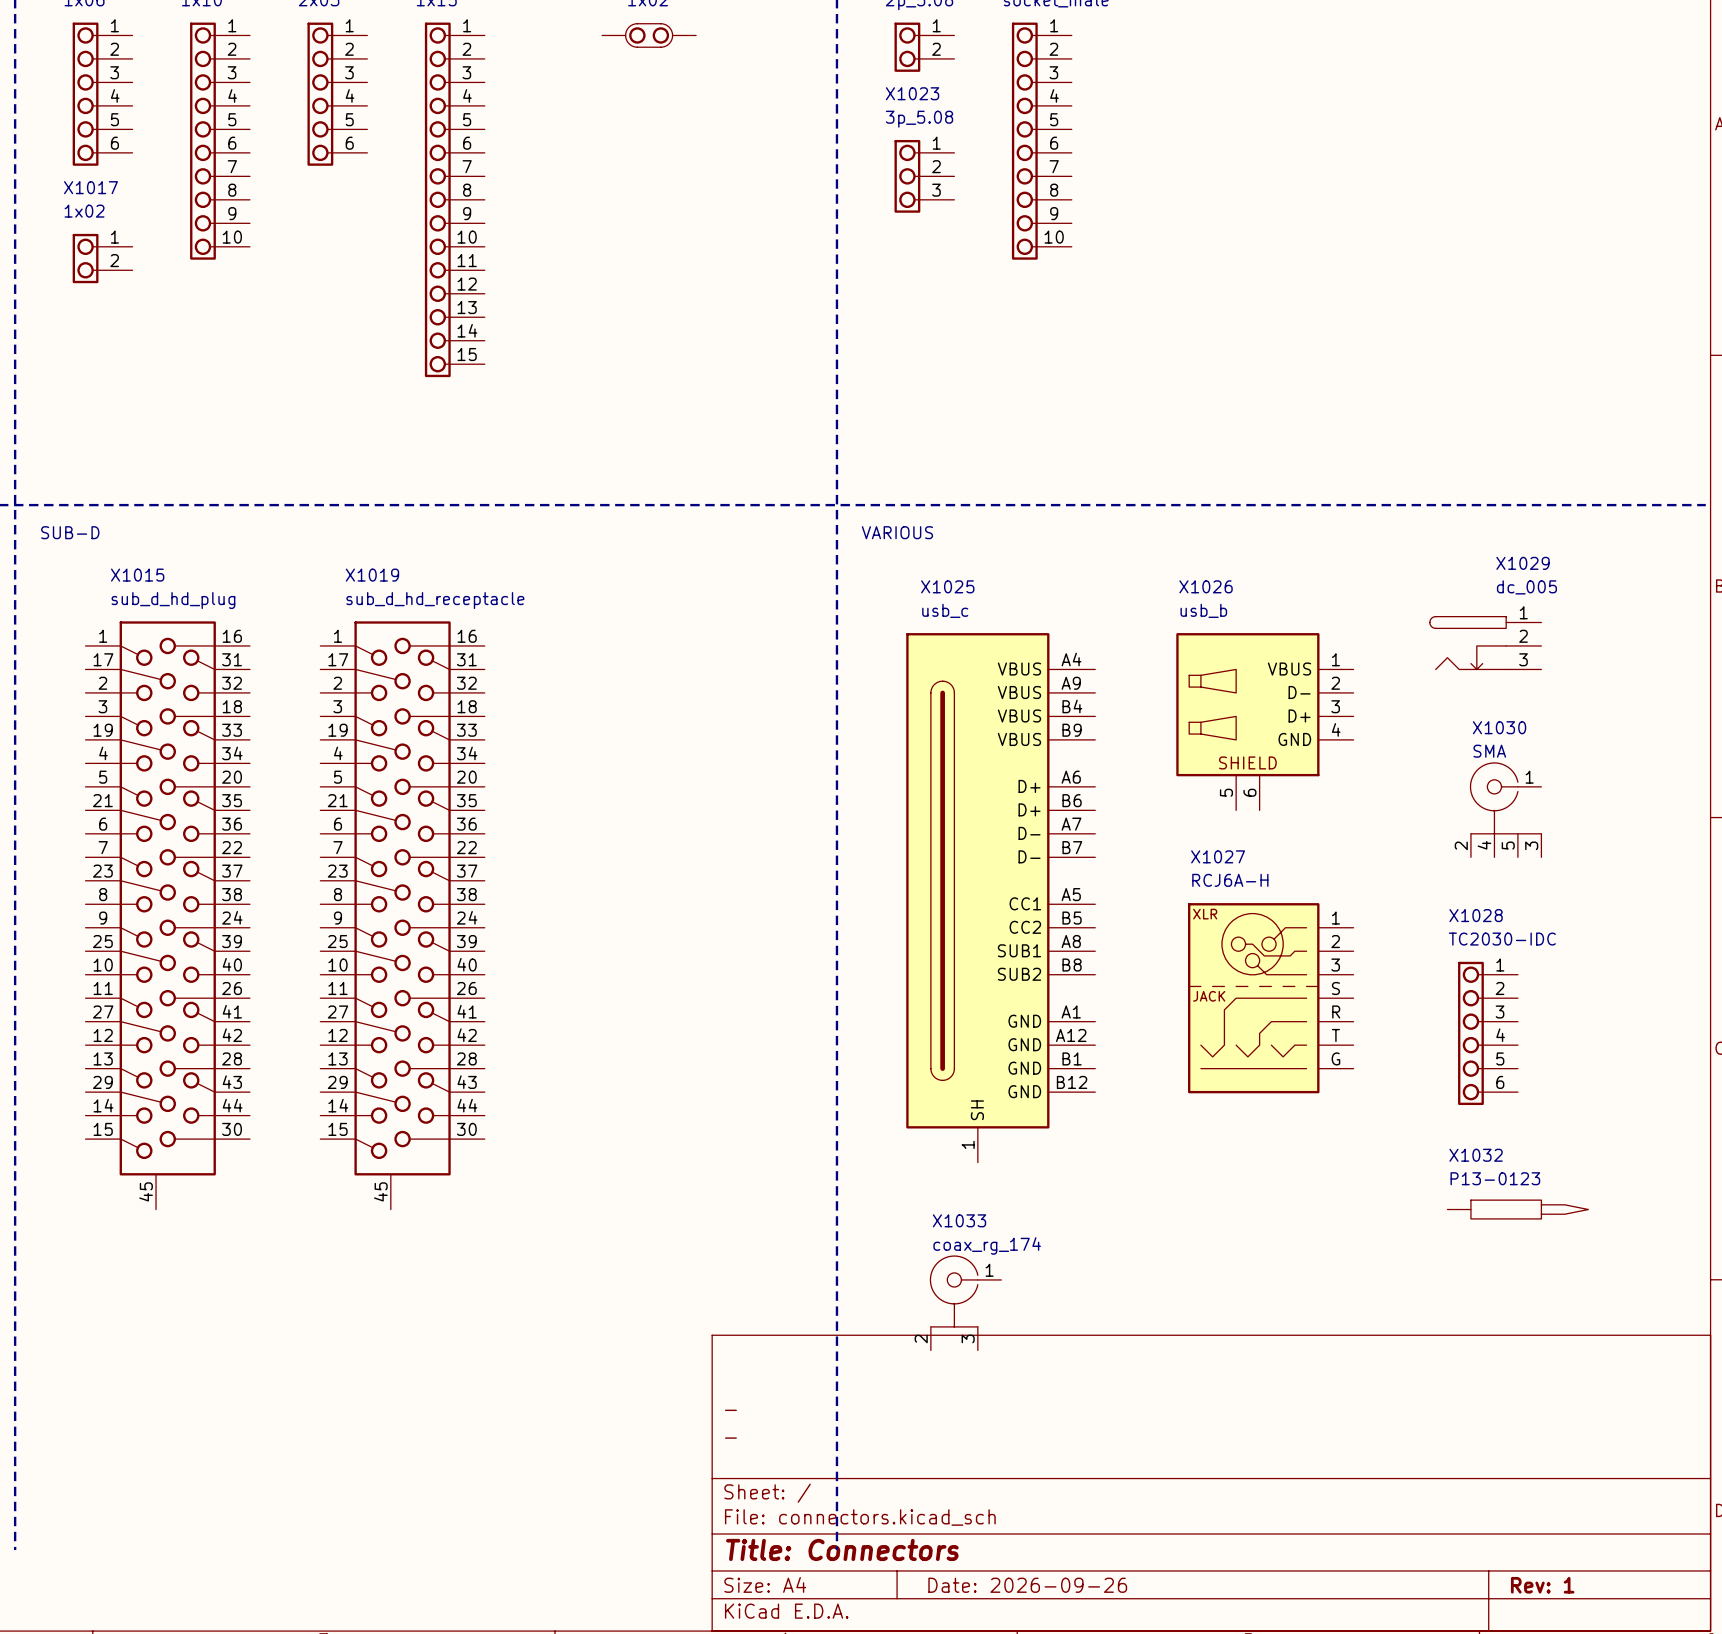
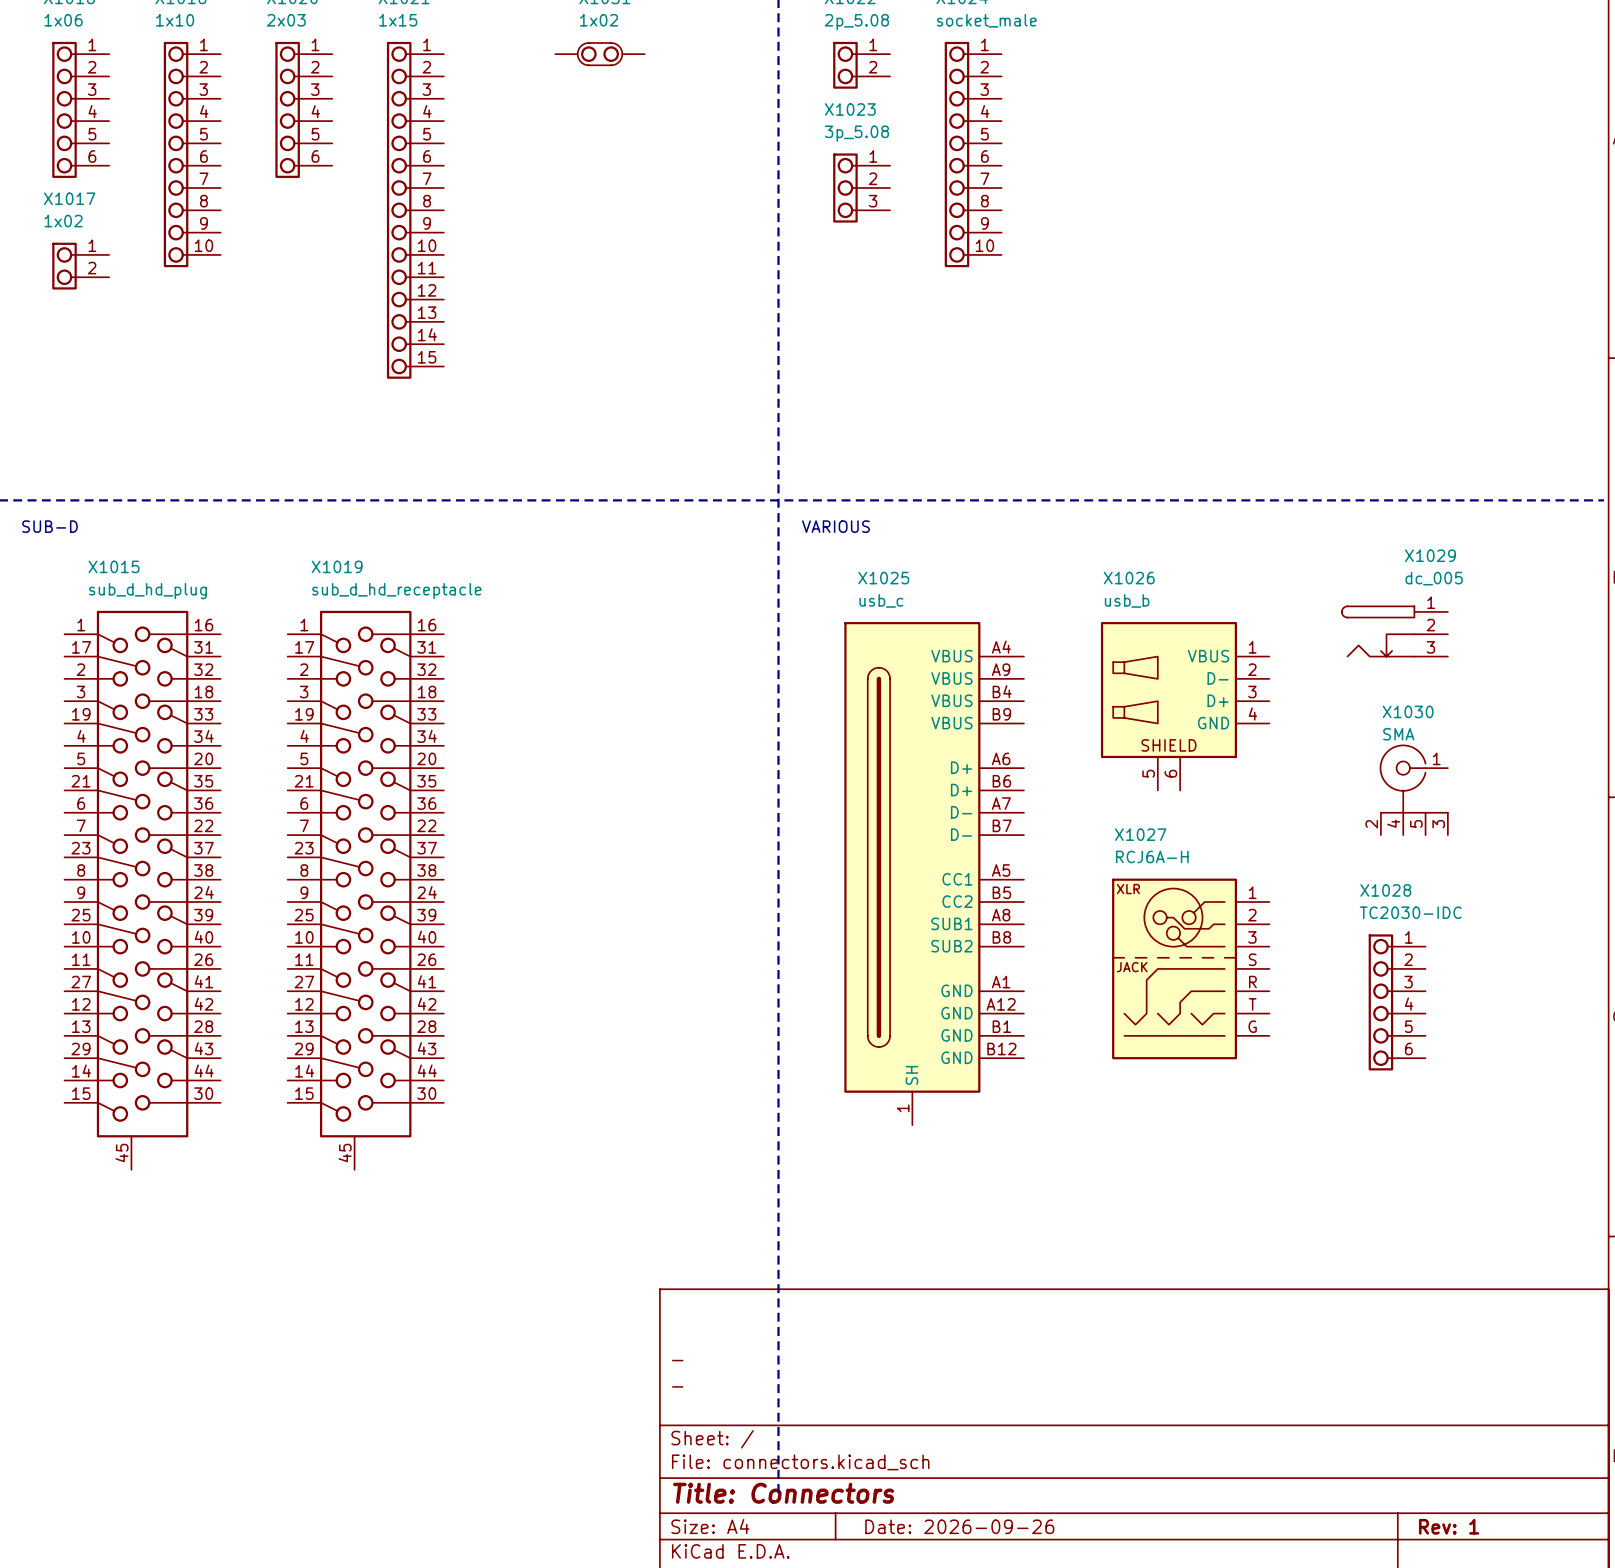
X1032: P13-0123 (1517, 1209) -> none
X1033: coax_rg_174 (965, 1303) -> none

